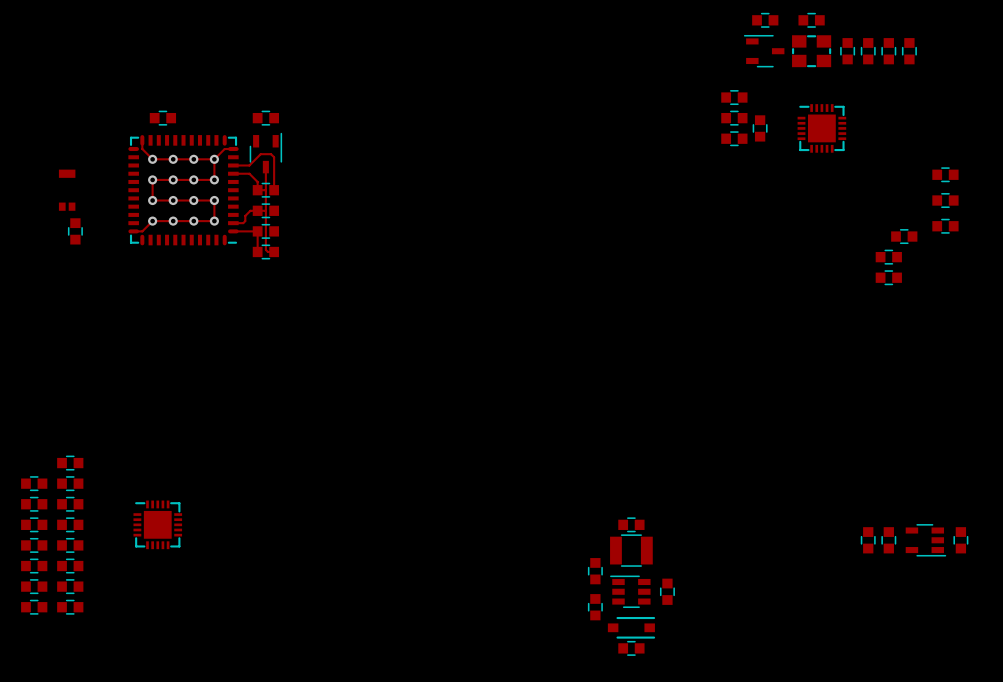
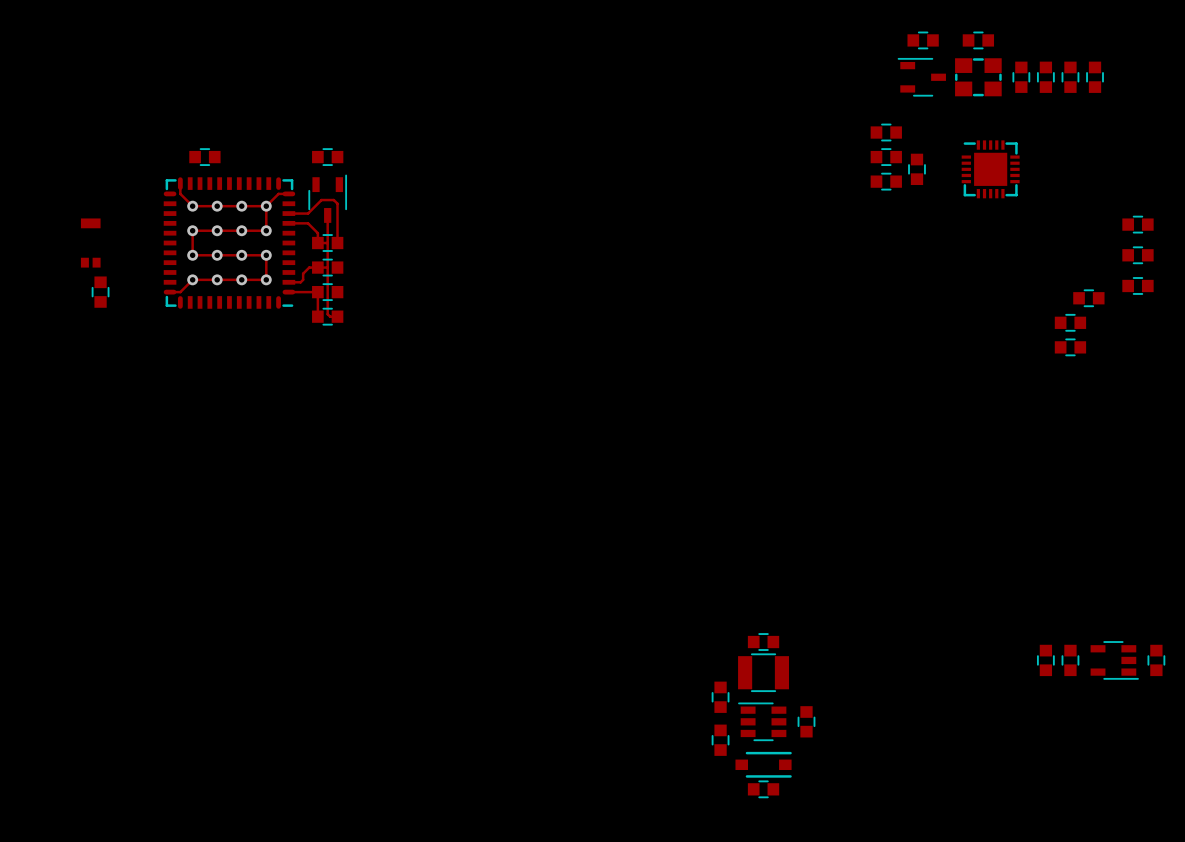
part: (70, 463) -> none
part: (34, 483) -> none
part: (70, 483) -> none
part: (34, 504) -> none
part: (70, 504) -> none
part: (34, 524) -> none
part: (70, 524) -> none
part: (157, 524) -> none
part: (34, 545) -> none
part: (70, 545) -> none
part: (34, 566) -> none
part: (70, 566) -> none
part: (34, 586) -> none
part: (70, 586) -> none
part: (34, 607) -> none
part: (70, 607) -> none

